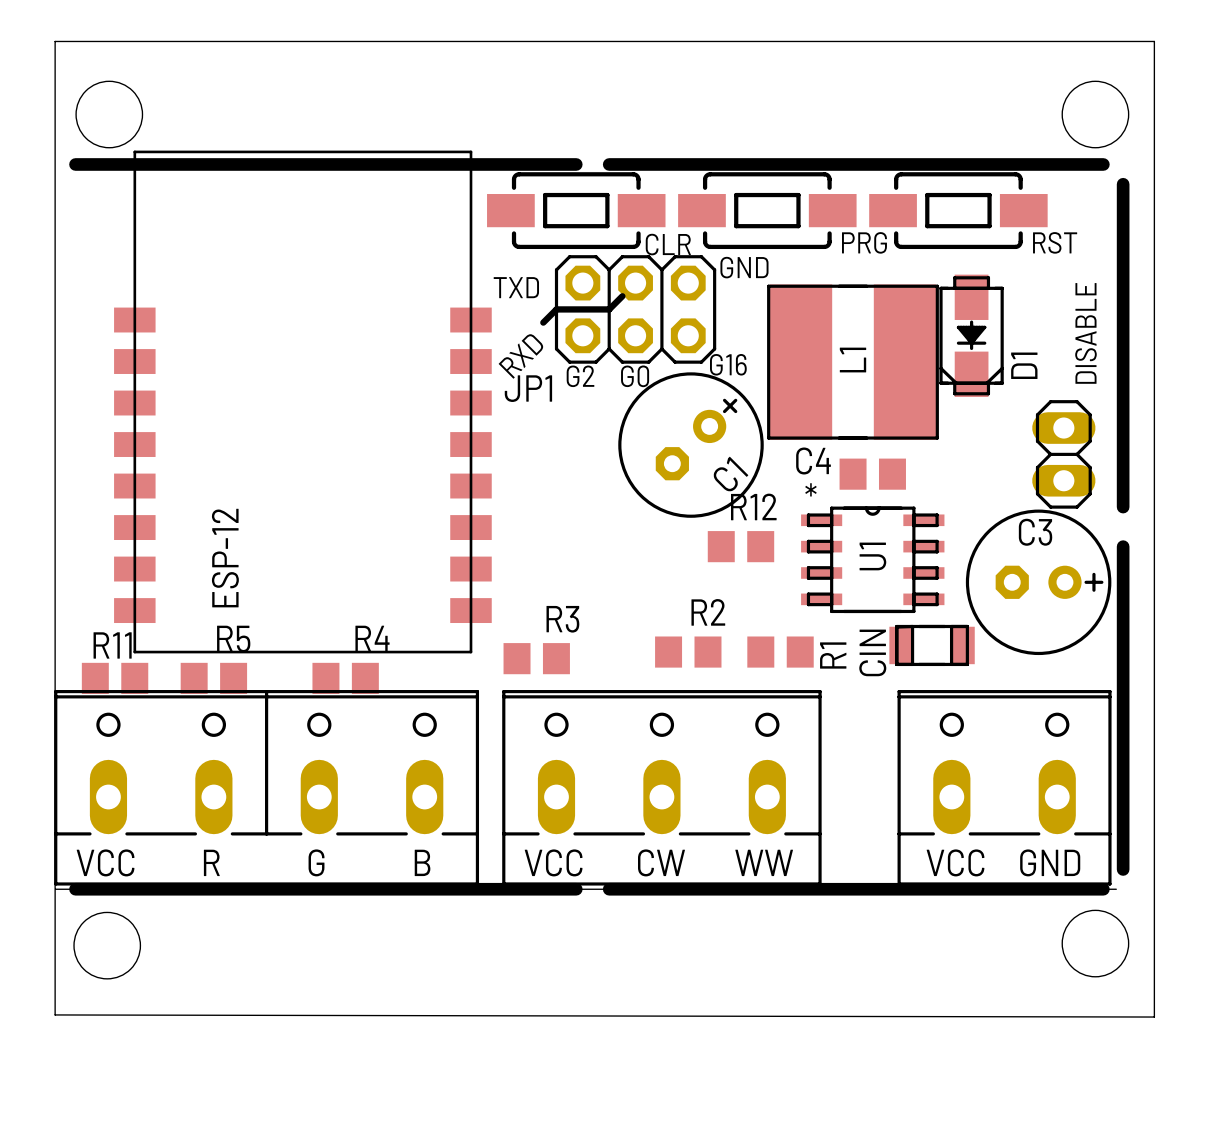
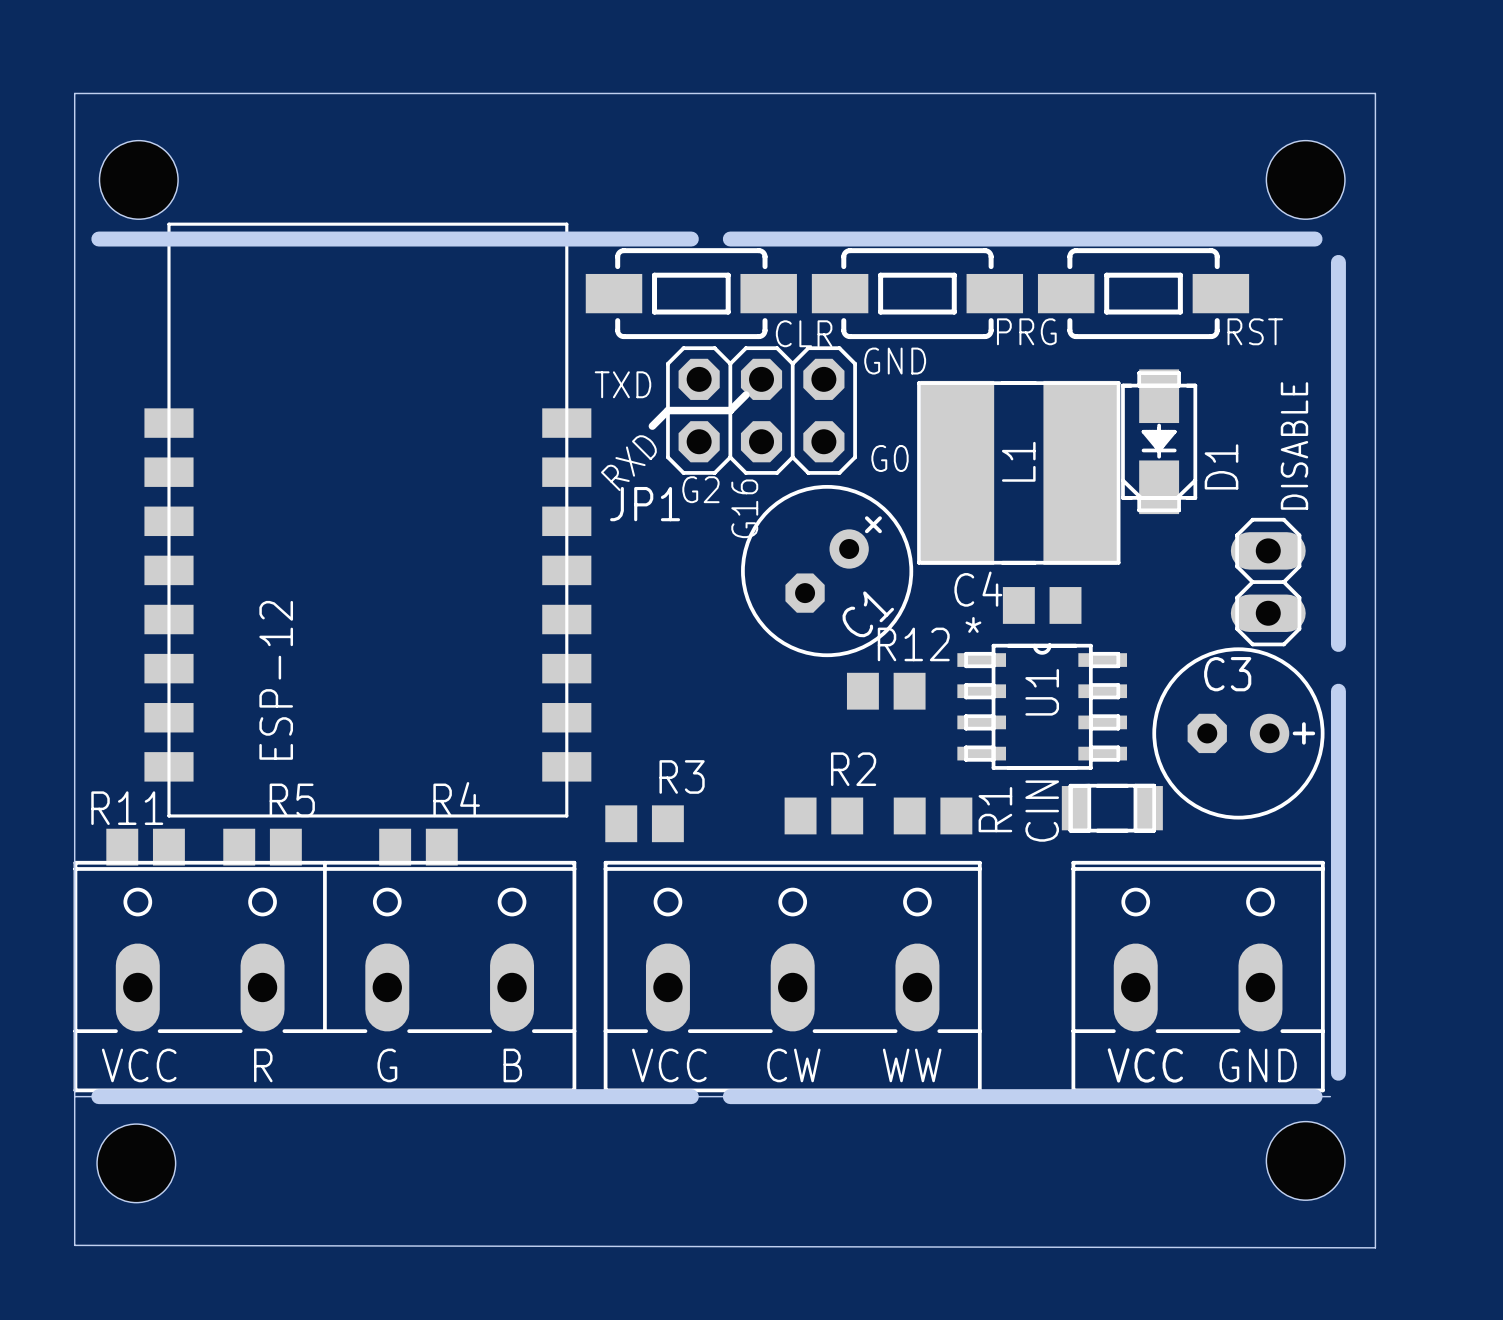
text rotation: 0° (728, 364) -> 90° counterclockwise (744, 508)
text position: G16 (728, 364) -> G16 (744, 508)
text position: G0 (635, 376) -> G0 (890, 458)

